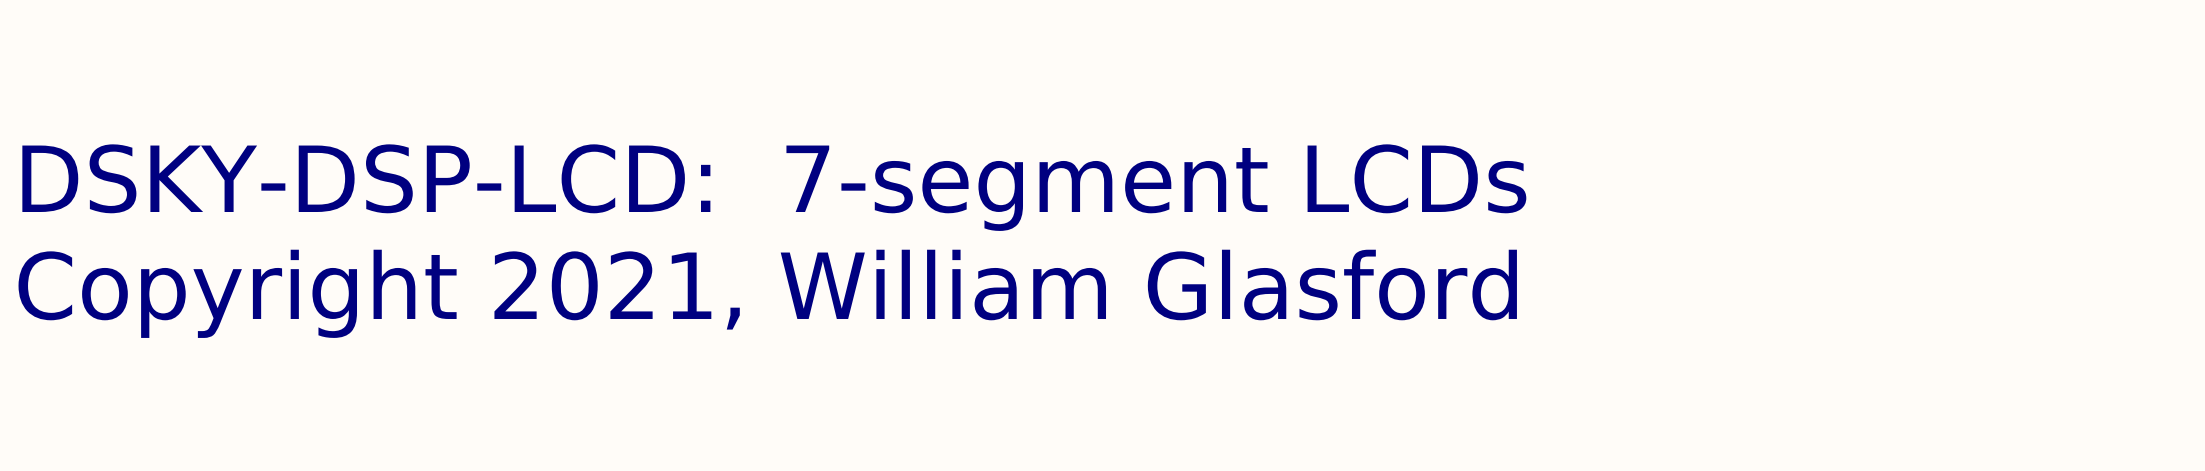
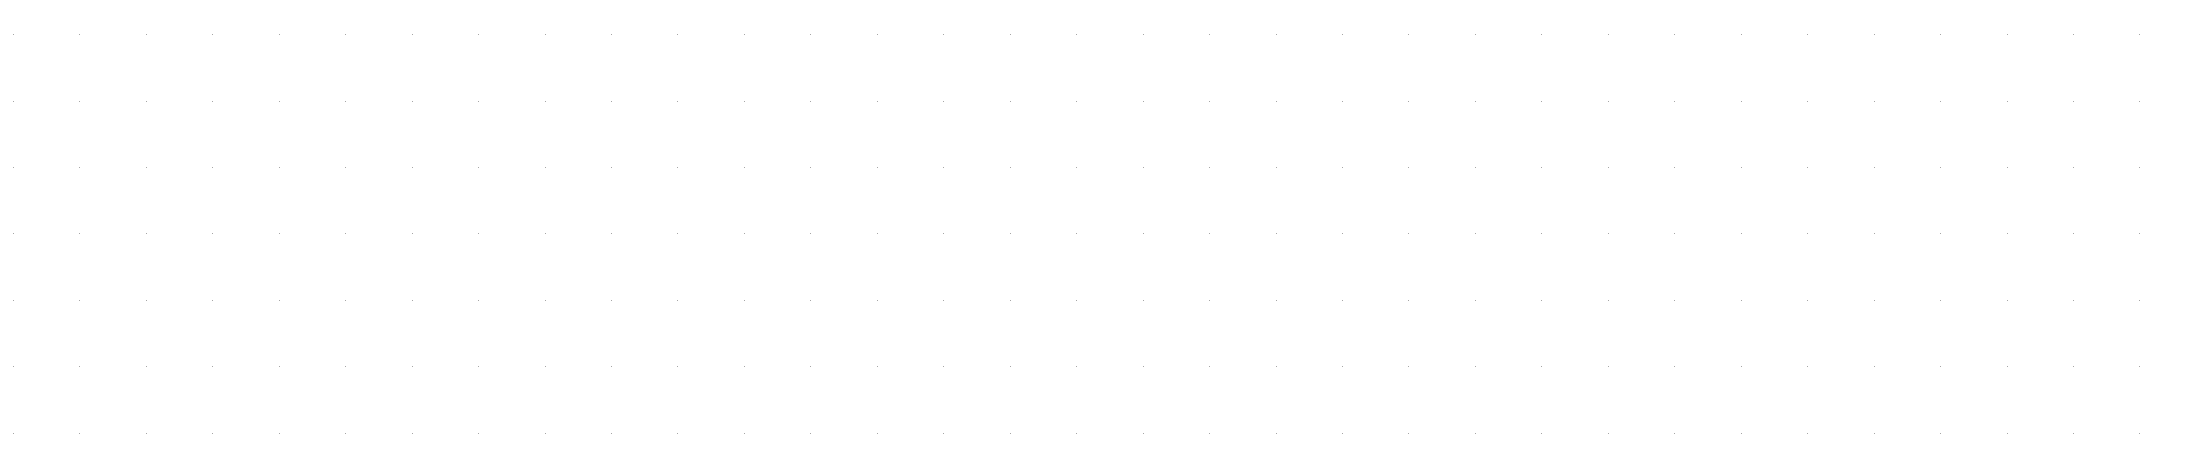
text: DSKY-DSP-LCD: 7-segment LCDs (774, 187) -> none
text: Copyright 2021, William Glasford (767, 293) -> none

